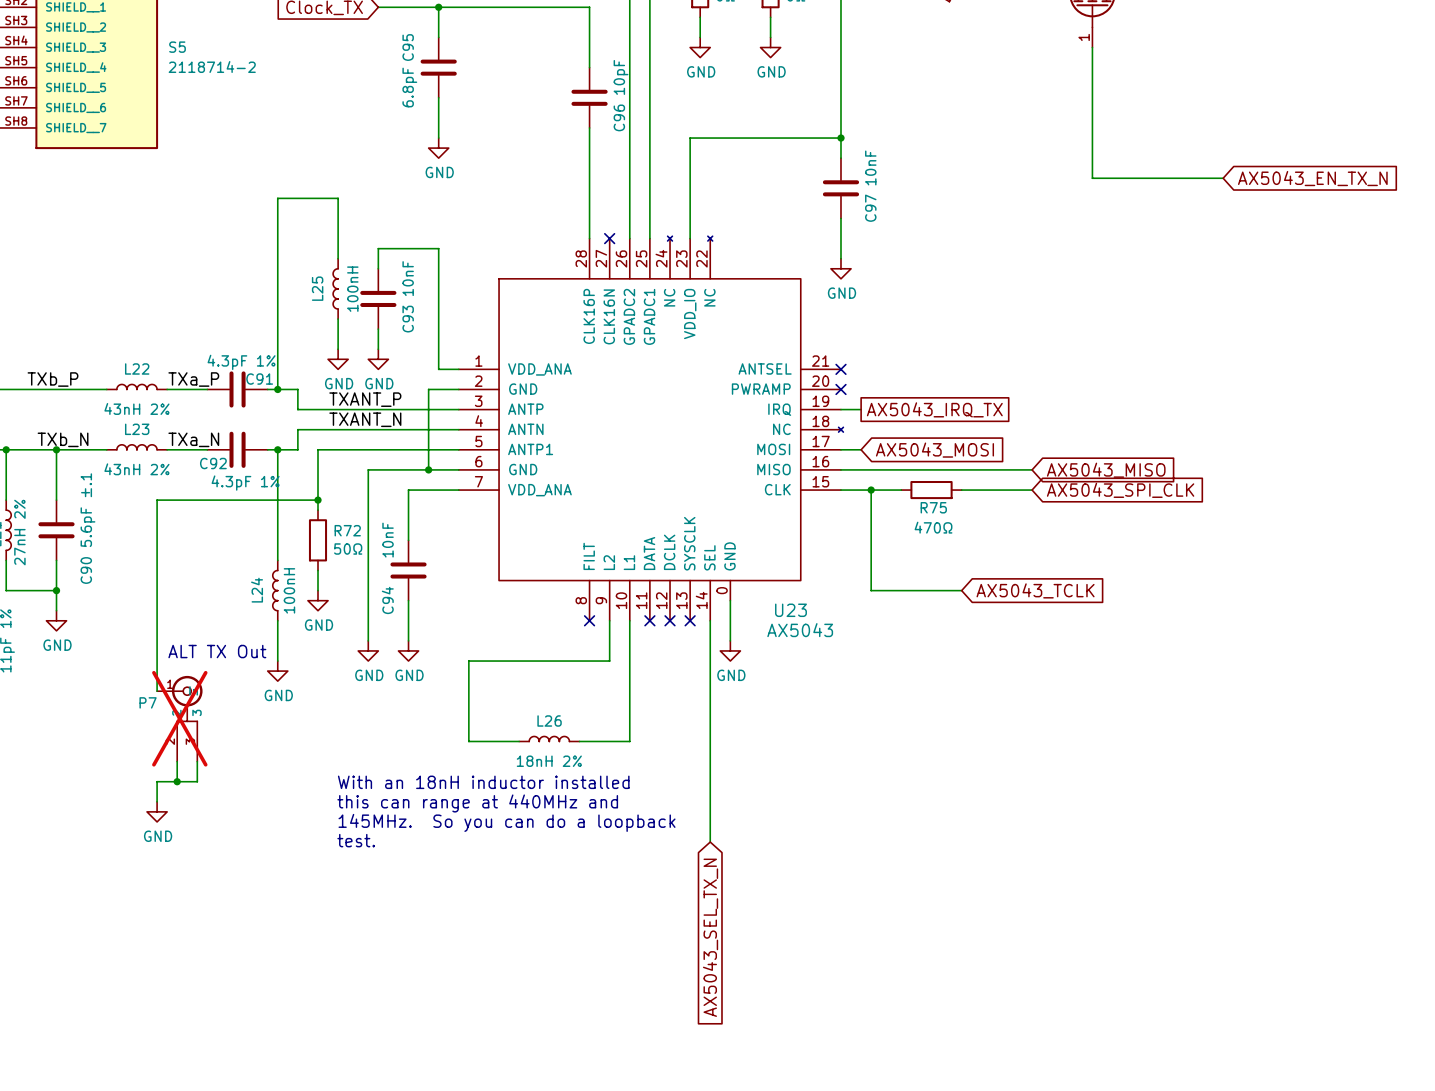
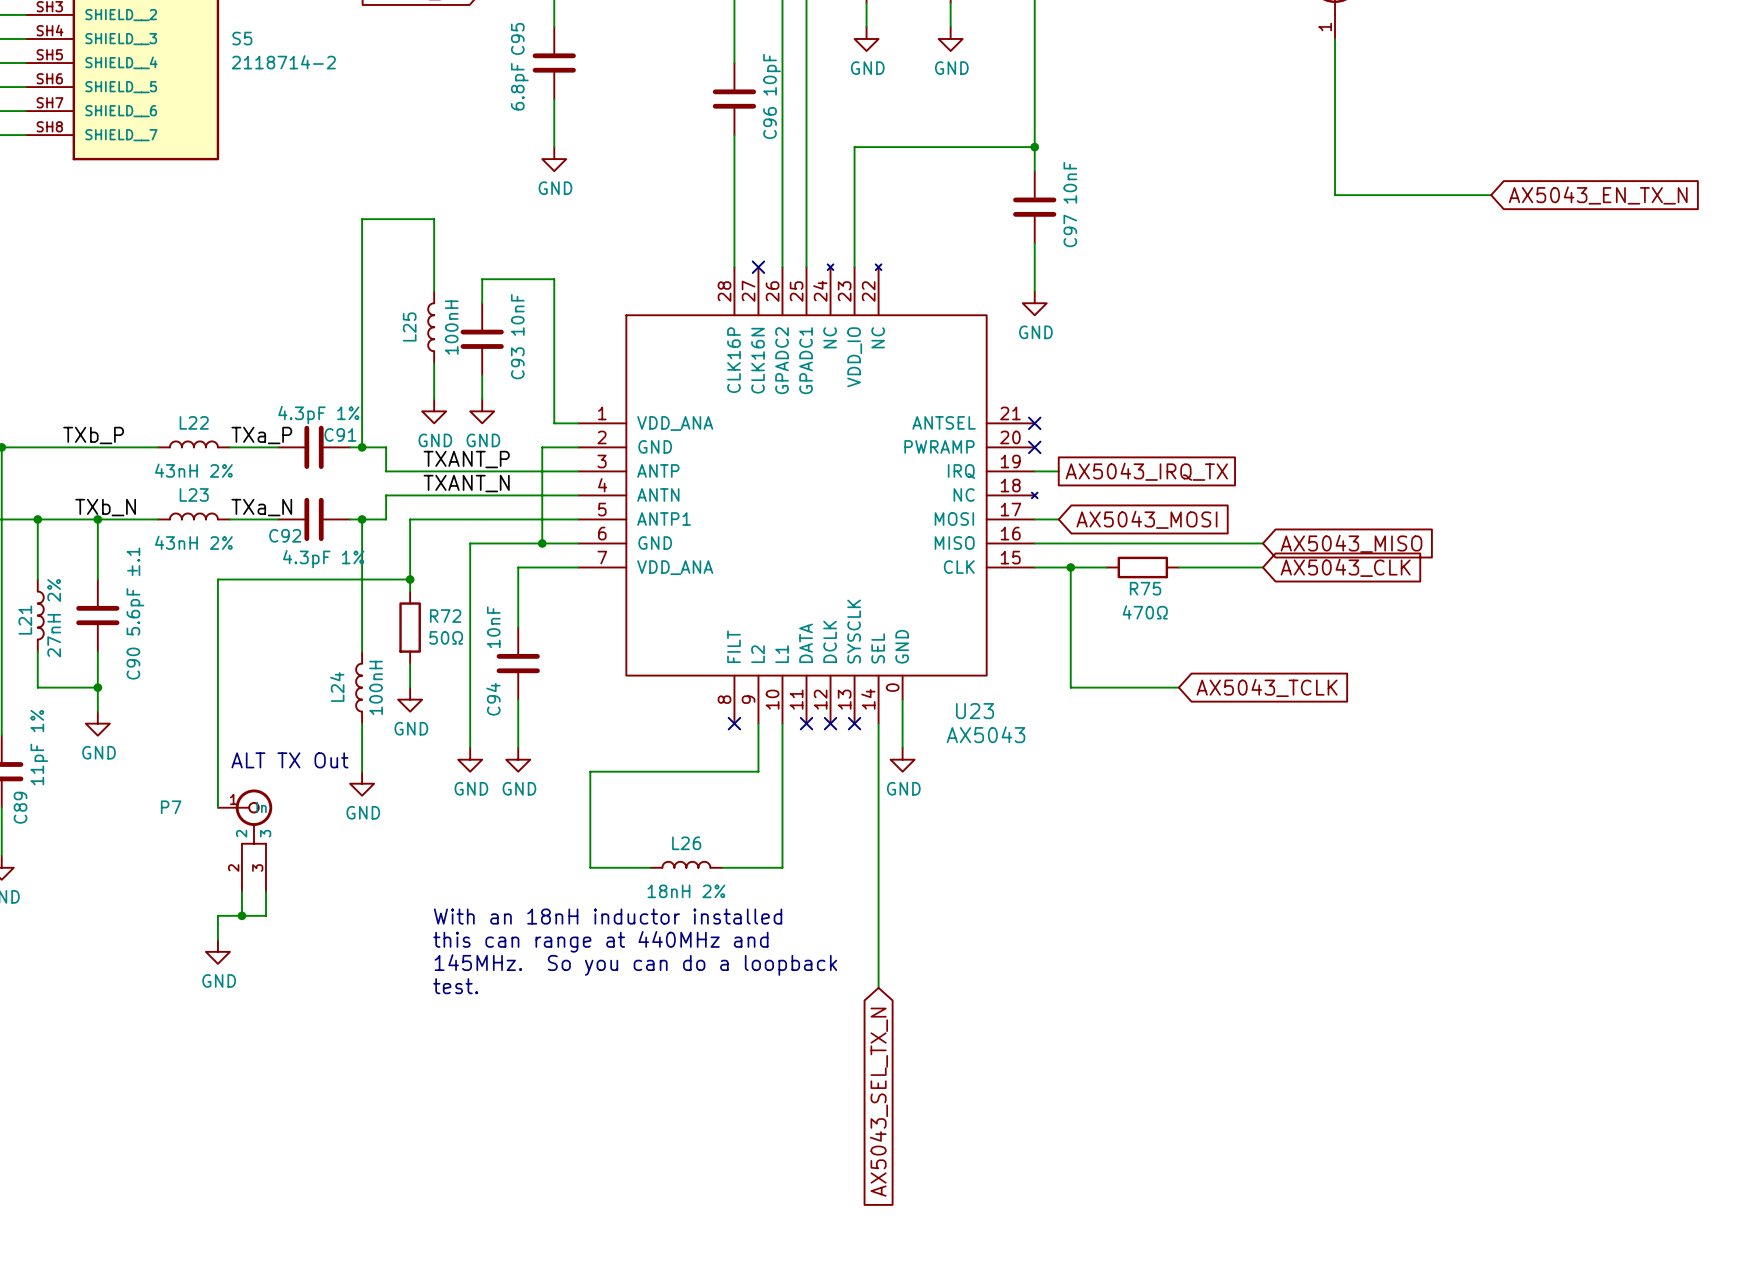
global label: AX5043_SPI_CLK (1120, 490) -> AX5043_CLK (1345, 567)
P7 name position: P7 (148, 702) -> P7 (171, 807)
P7 do-not-place cross: (179, 718) -> none

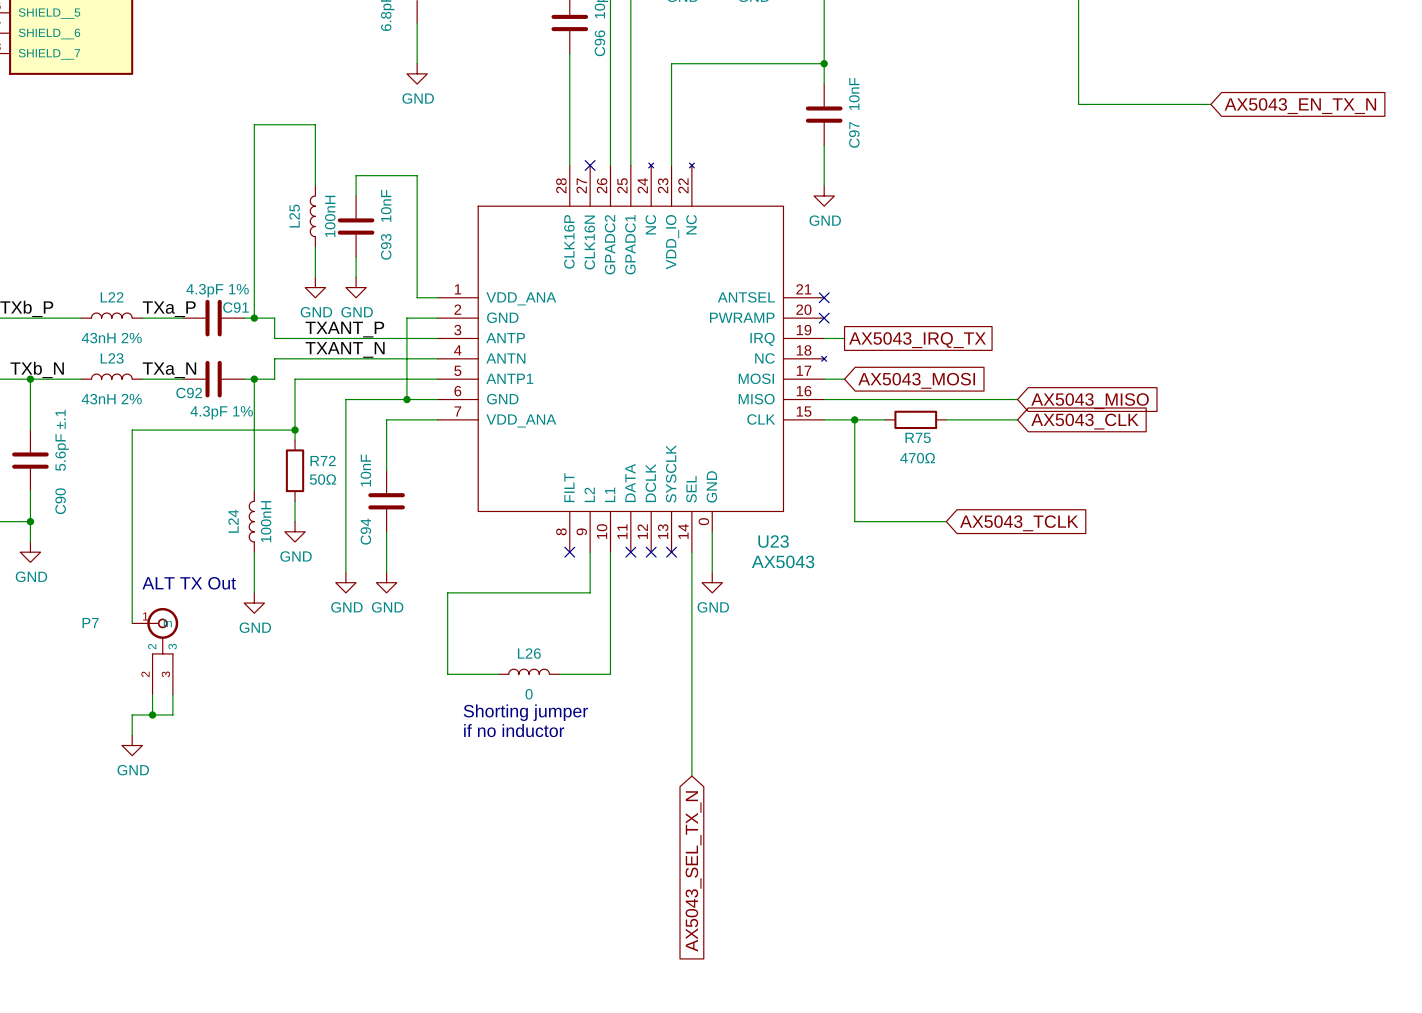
L26 value: 18nH 2% (686, 891) -> 0 (529, 694)
text: none -> Shorting jumper (525, 712)
text: With an 18nH inductor installed (608, 916) -> none
text: none -> if no inductor (514, 730)
text: this can range at 440MHz and (600, 941) -> none
text: 145MHz. So you can do a loopback (635, 965) -> none
text: test. (455, 986) -> none

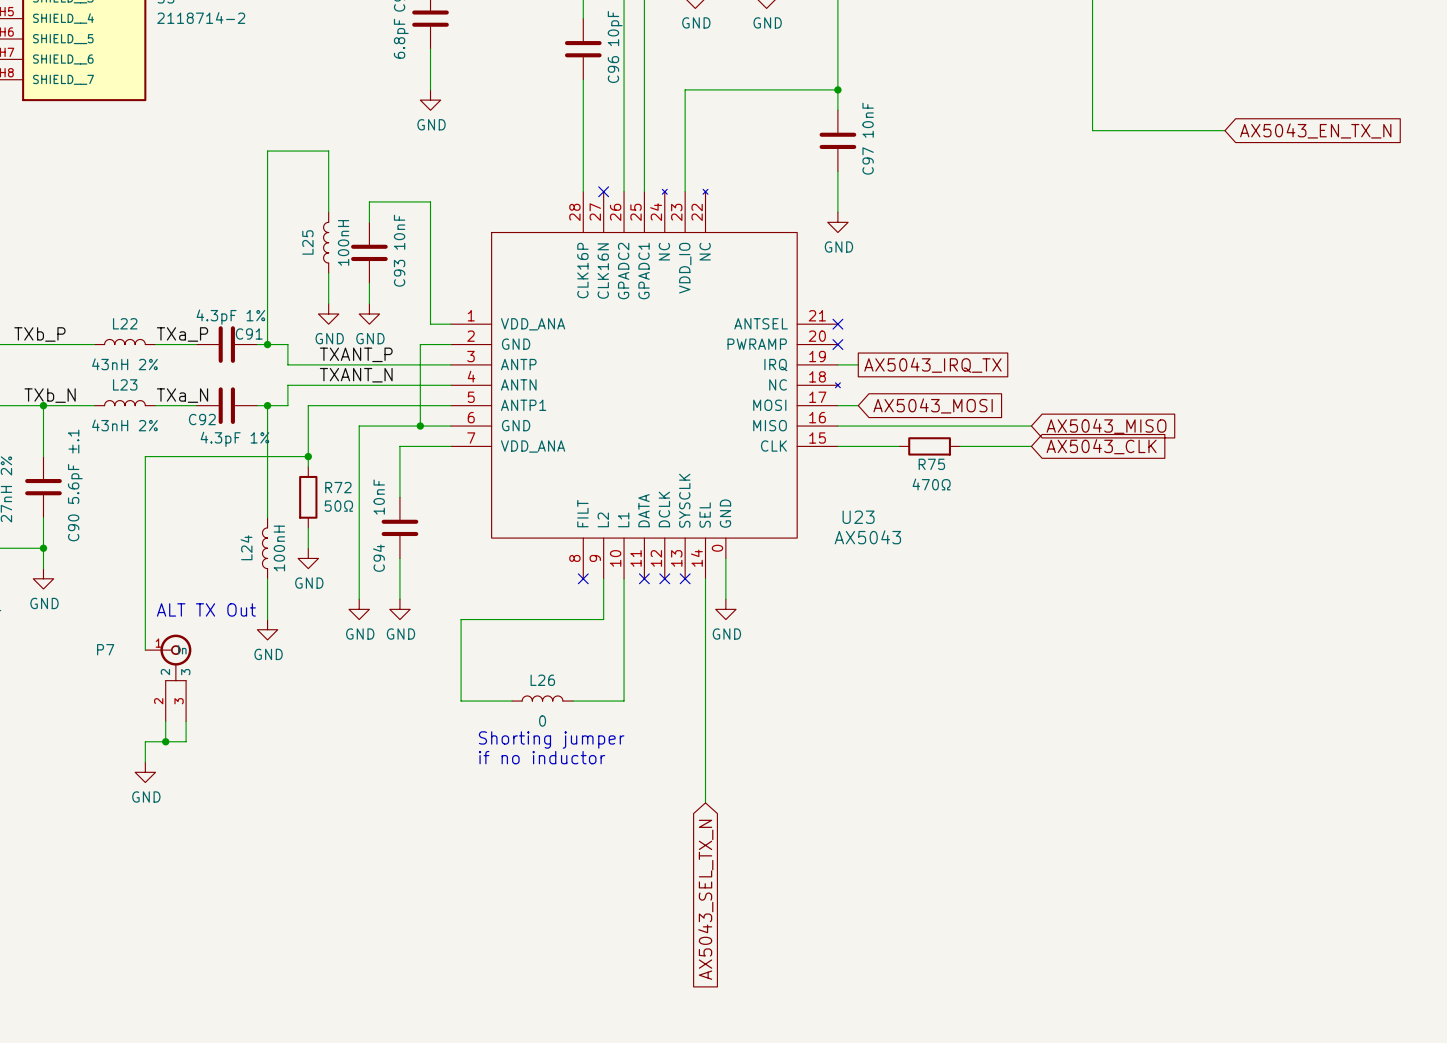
wire: (854, 419) (854, 521) (946, 521) -> none
junction: (854, 419) -> none
global label: AX5043_TCLK (1019, 523) -> none
U23 name position: U23 (773, 541) -> U23 (858, 517)
U23 value position: AX5043 (783, 561) -> AX5043 (867, 537)

